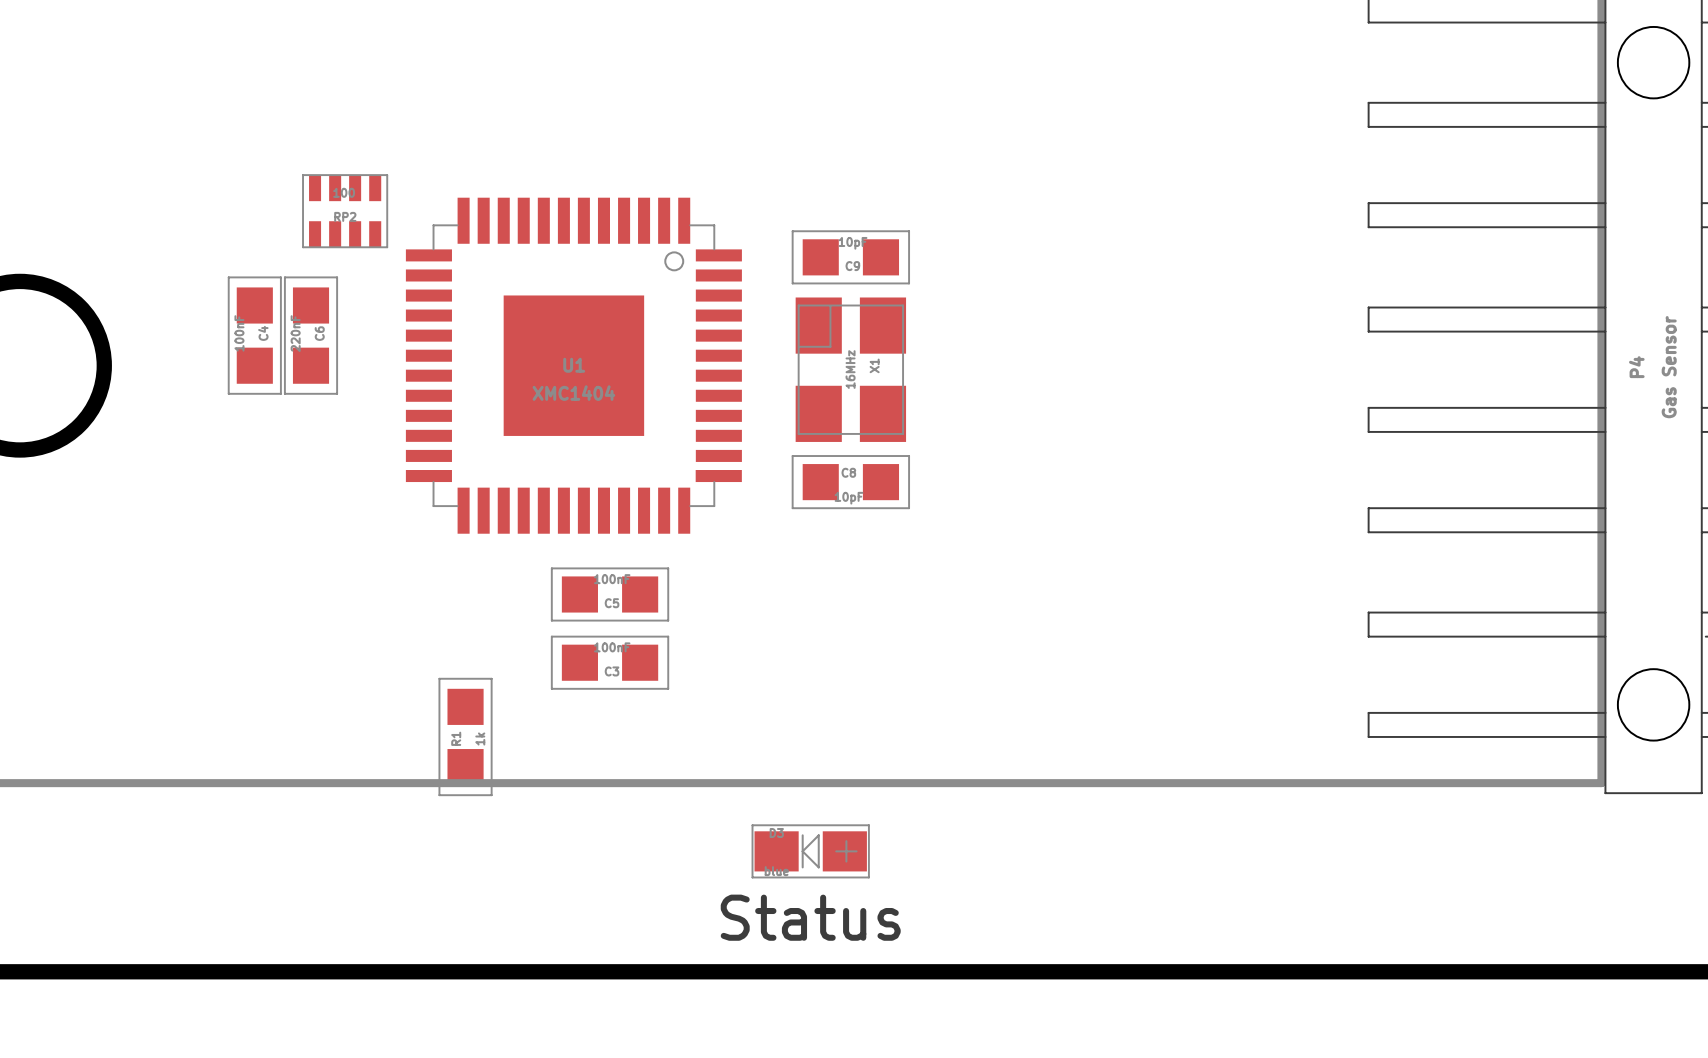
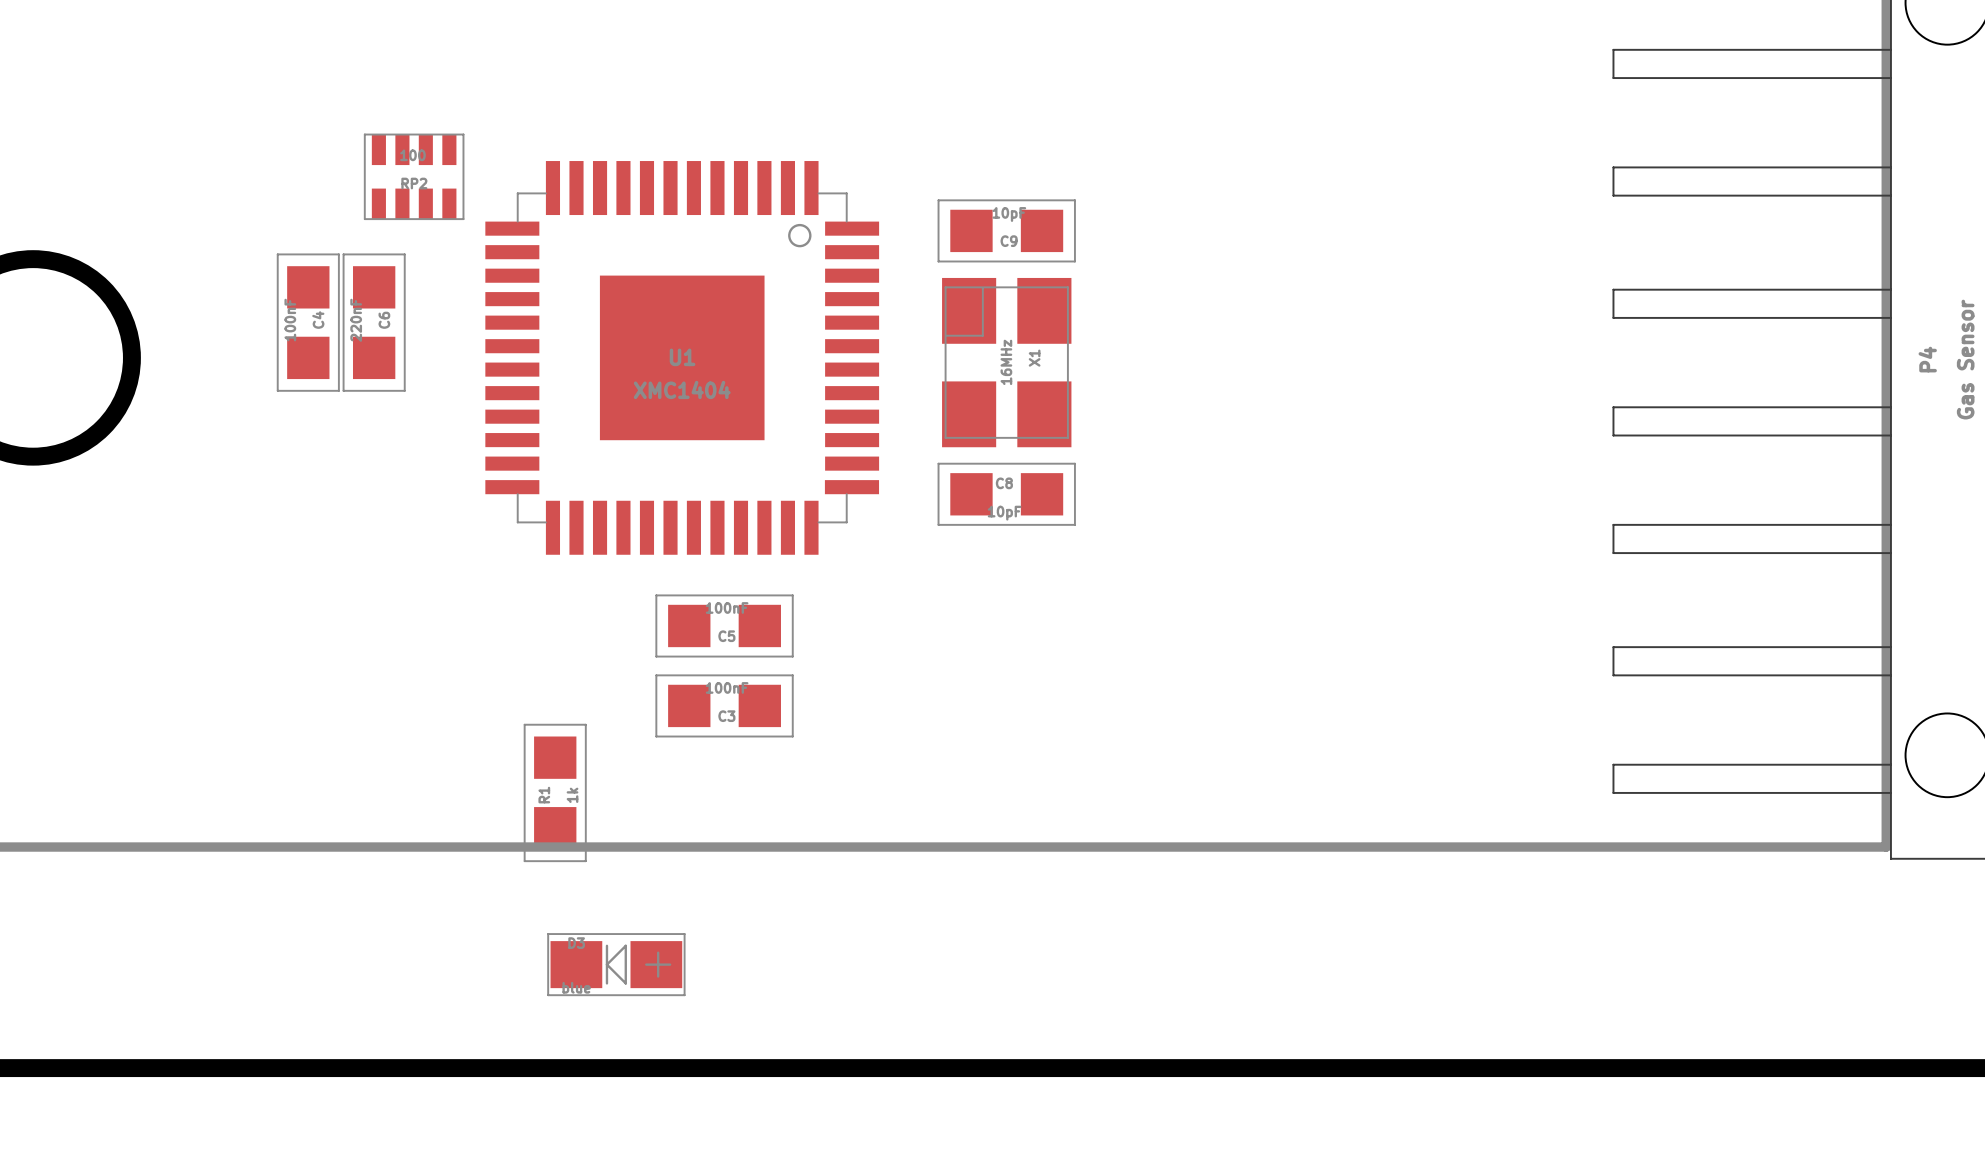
part position: (810, 851) -> (616, 964)
text: Status (810, 917) -> none

